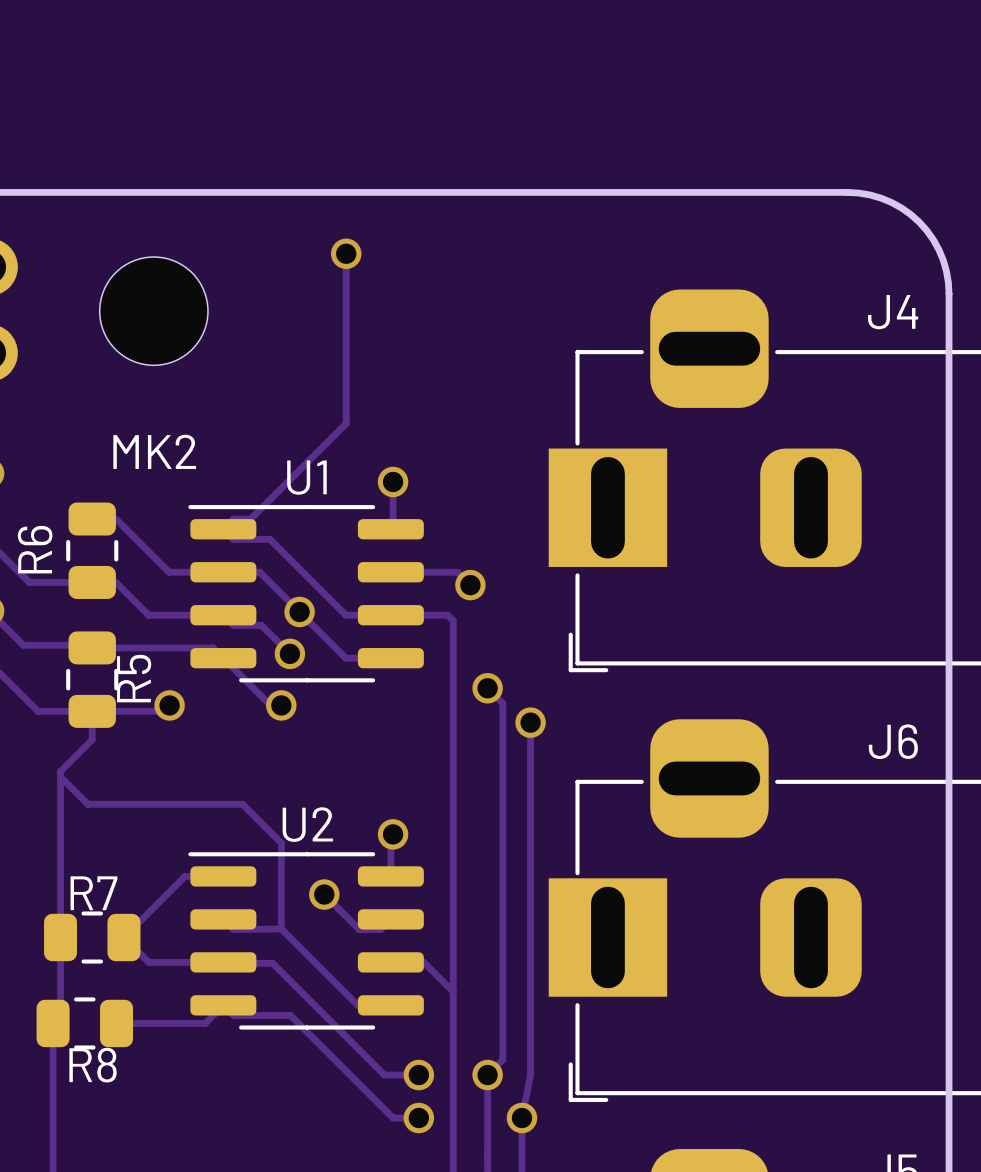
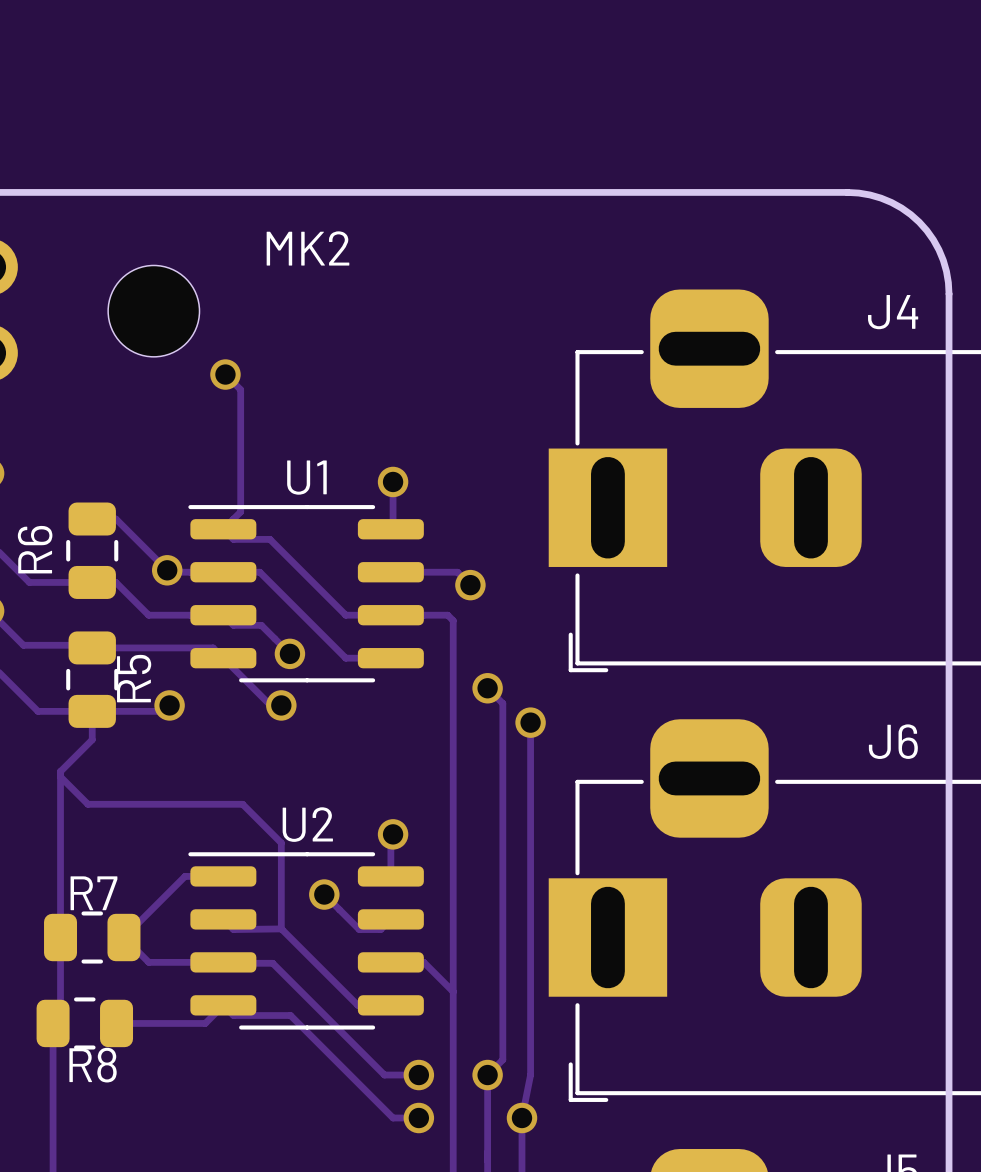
track: (346, 253) (346, 423) (250, 519) (233, 519) -> (225, 374) (240, 389) (240, 511) (233, 519)
via: (346, 253) -> none
MK2 footprint: [99, 257, 208, 366] -> [108, 265, 200, 357]
via: none -> (225, 374)
MK2 name position: MK2 (154, 451) -> MK2 (307, 248)
via: none -> (167, 570)
via: (299, 611) -> none

